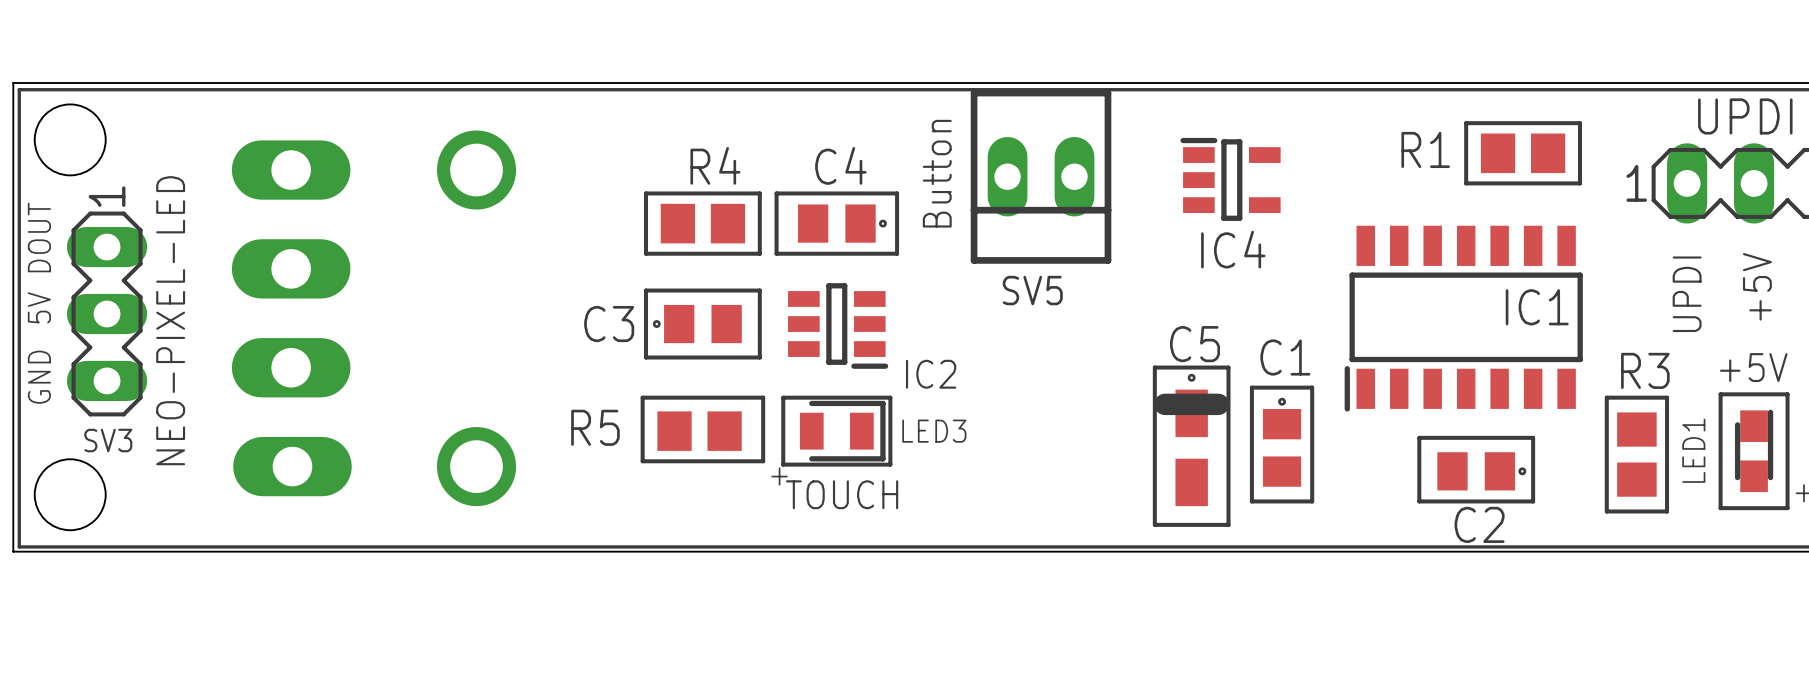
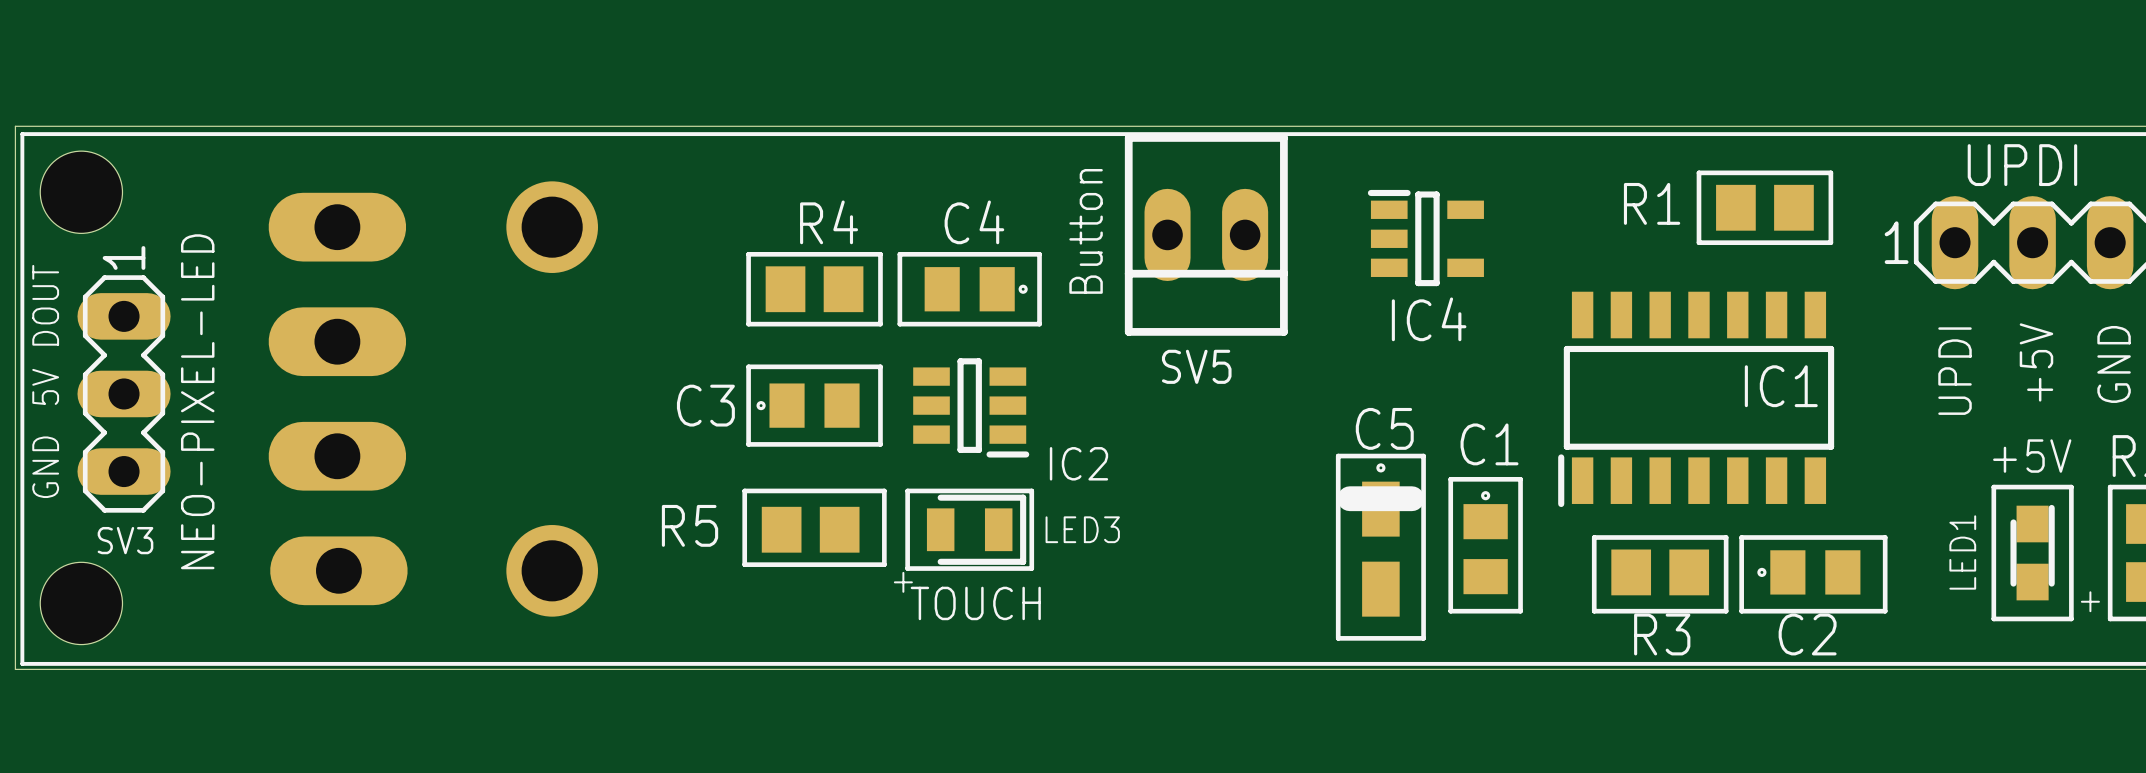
R3 name position: R3 (1645, 370) -> R3 (1662, 634)
line: (1606, 397) (1667, 397) (1667, 511) (1606, 511) (1606, 397) -> none
line: (1419, 437) (1419, 501) -> (1644, 537) (1594, 537) (1594, 611) (1644, 611)
line: (1489, 437) (1502, 437) -> (1726, 537) (1726, 611)
line: (1533, 437) (1533, 501) -> (1776, 537) (1885, 537) (1885, 611) (1776, 611)
R3 rotation: 0° (1636, 454) -> 90° clockwise (1660, 572)
R3 position: (1636, 454) -> (1660, 572)
C2 rotation: 0° (1481, 471) -> 180° (1808, 572)
C2 position: (1481, 471) -> (1808, 572)
line: (1489, 501) (1502, 501) -> (1741, 537) (1741, 611)

